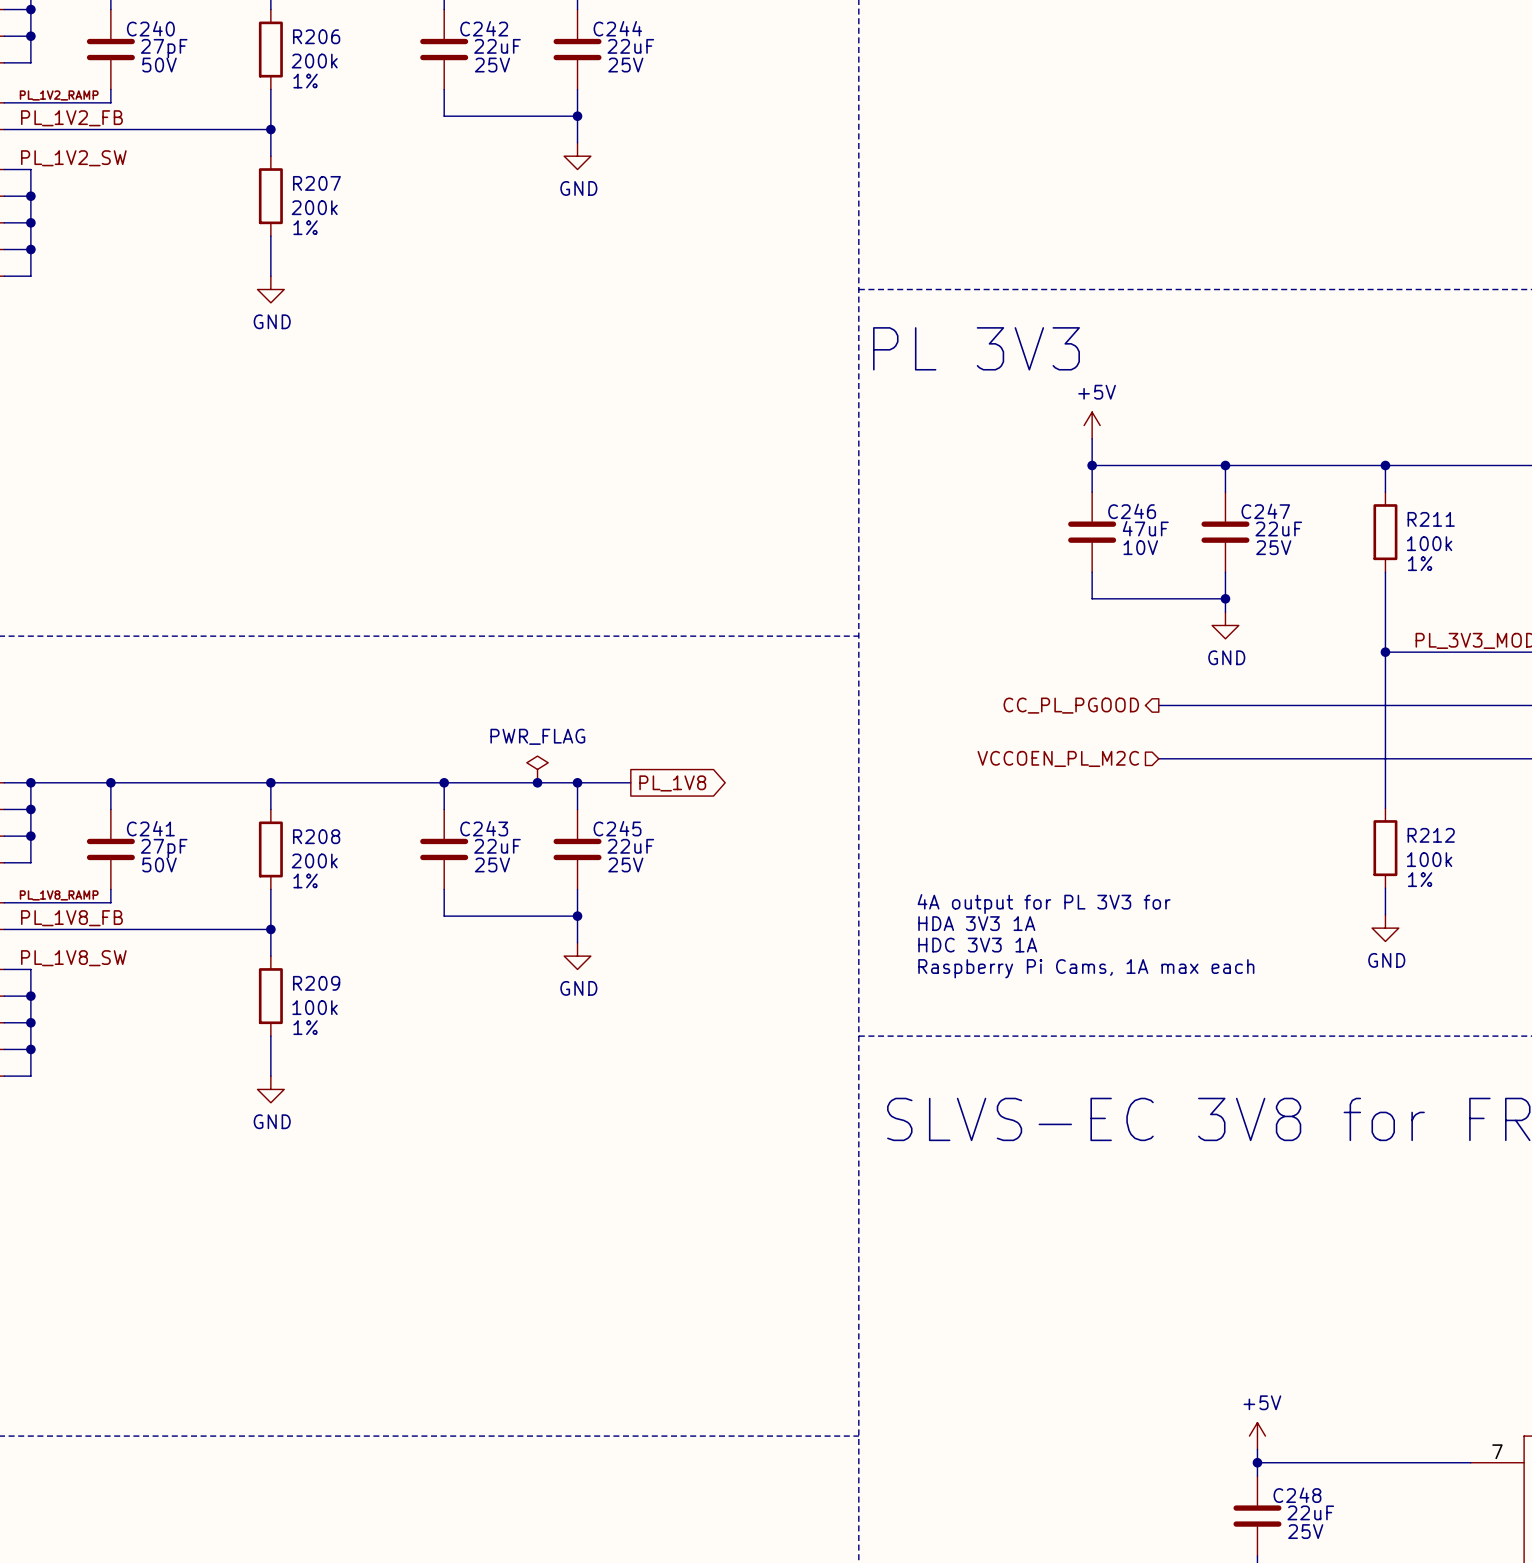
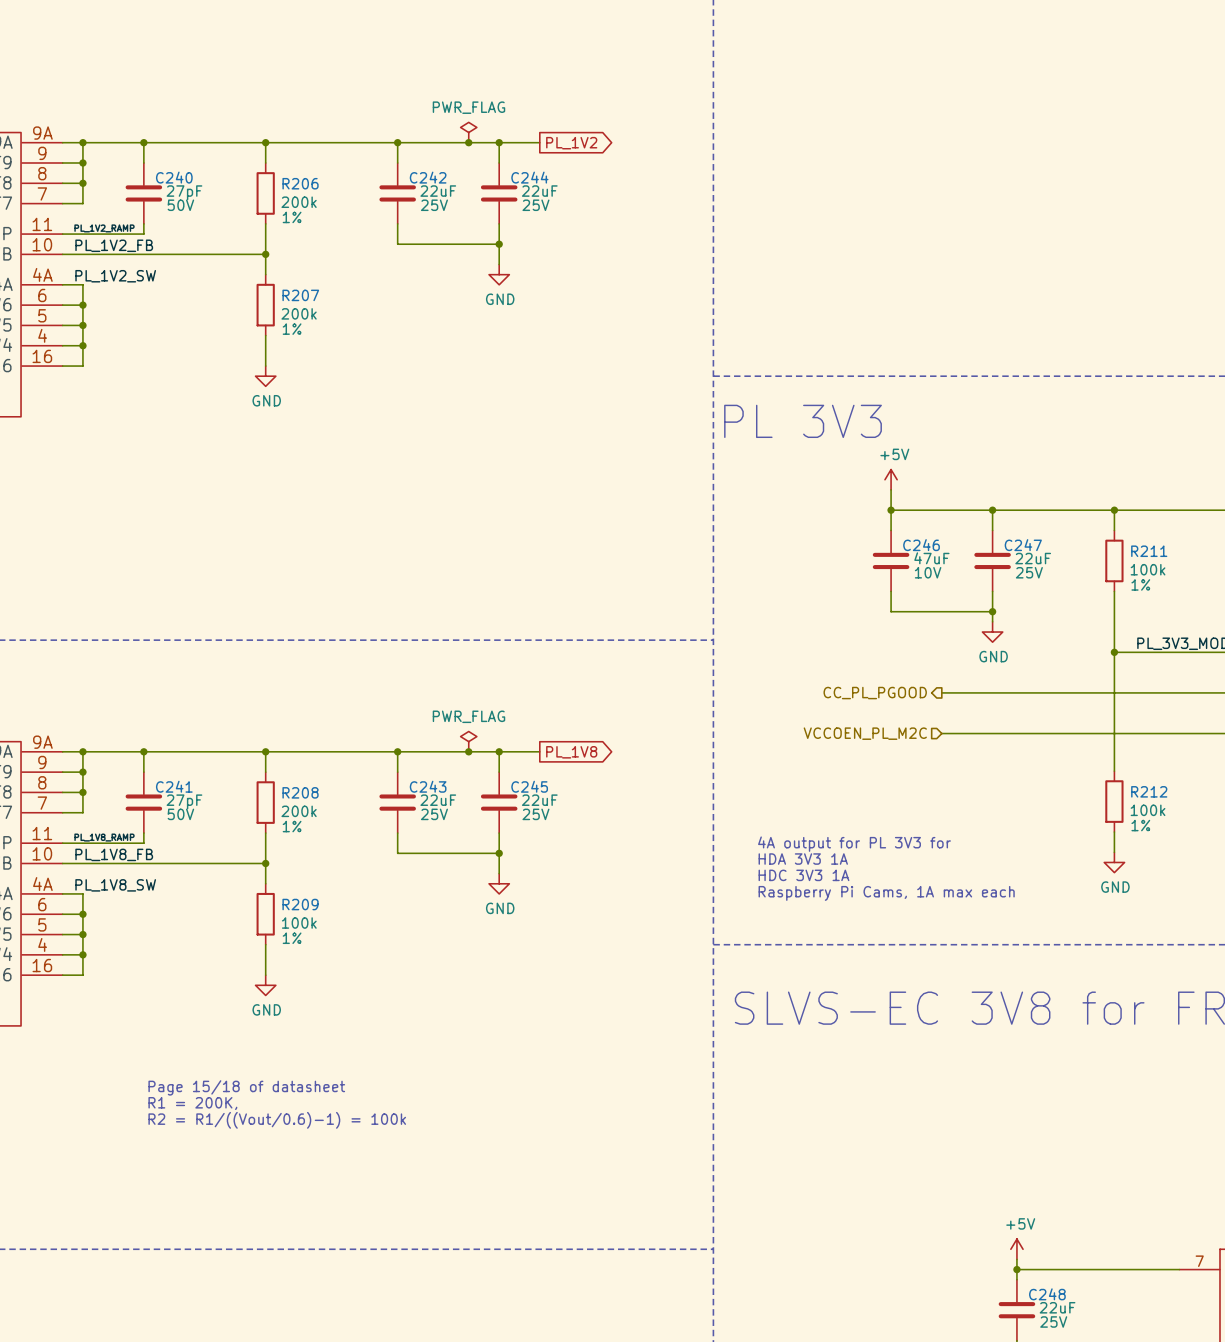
text: none -> Page 15/18 of datasheet (246, 1087)
text: none -> R1 = 200K, (192, 1103)
text: none -> R2 = R1/((Vout/0.6)-1) = 100k (277, 1120)

